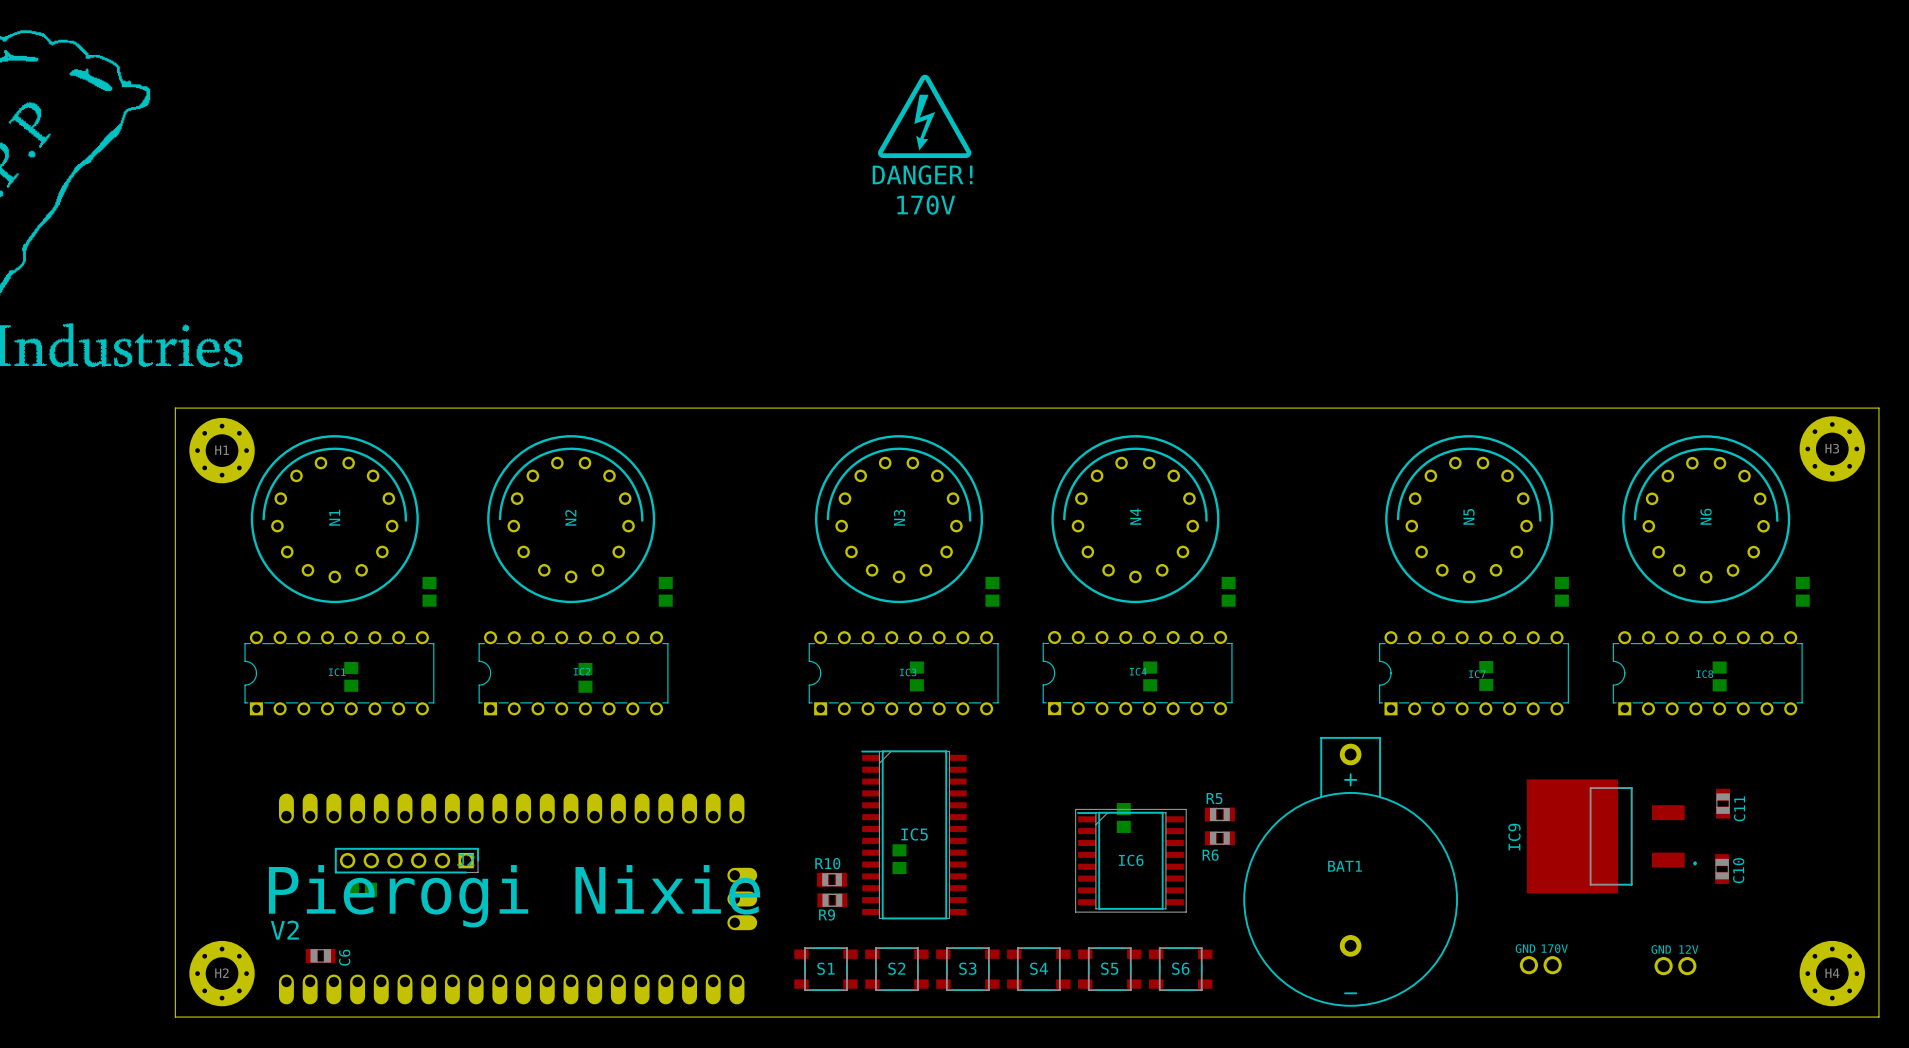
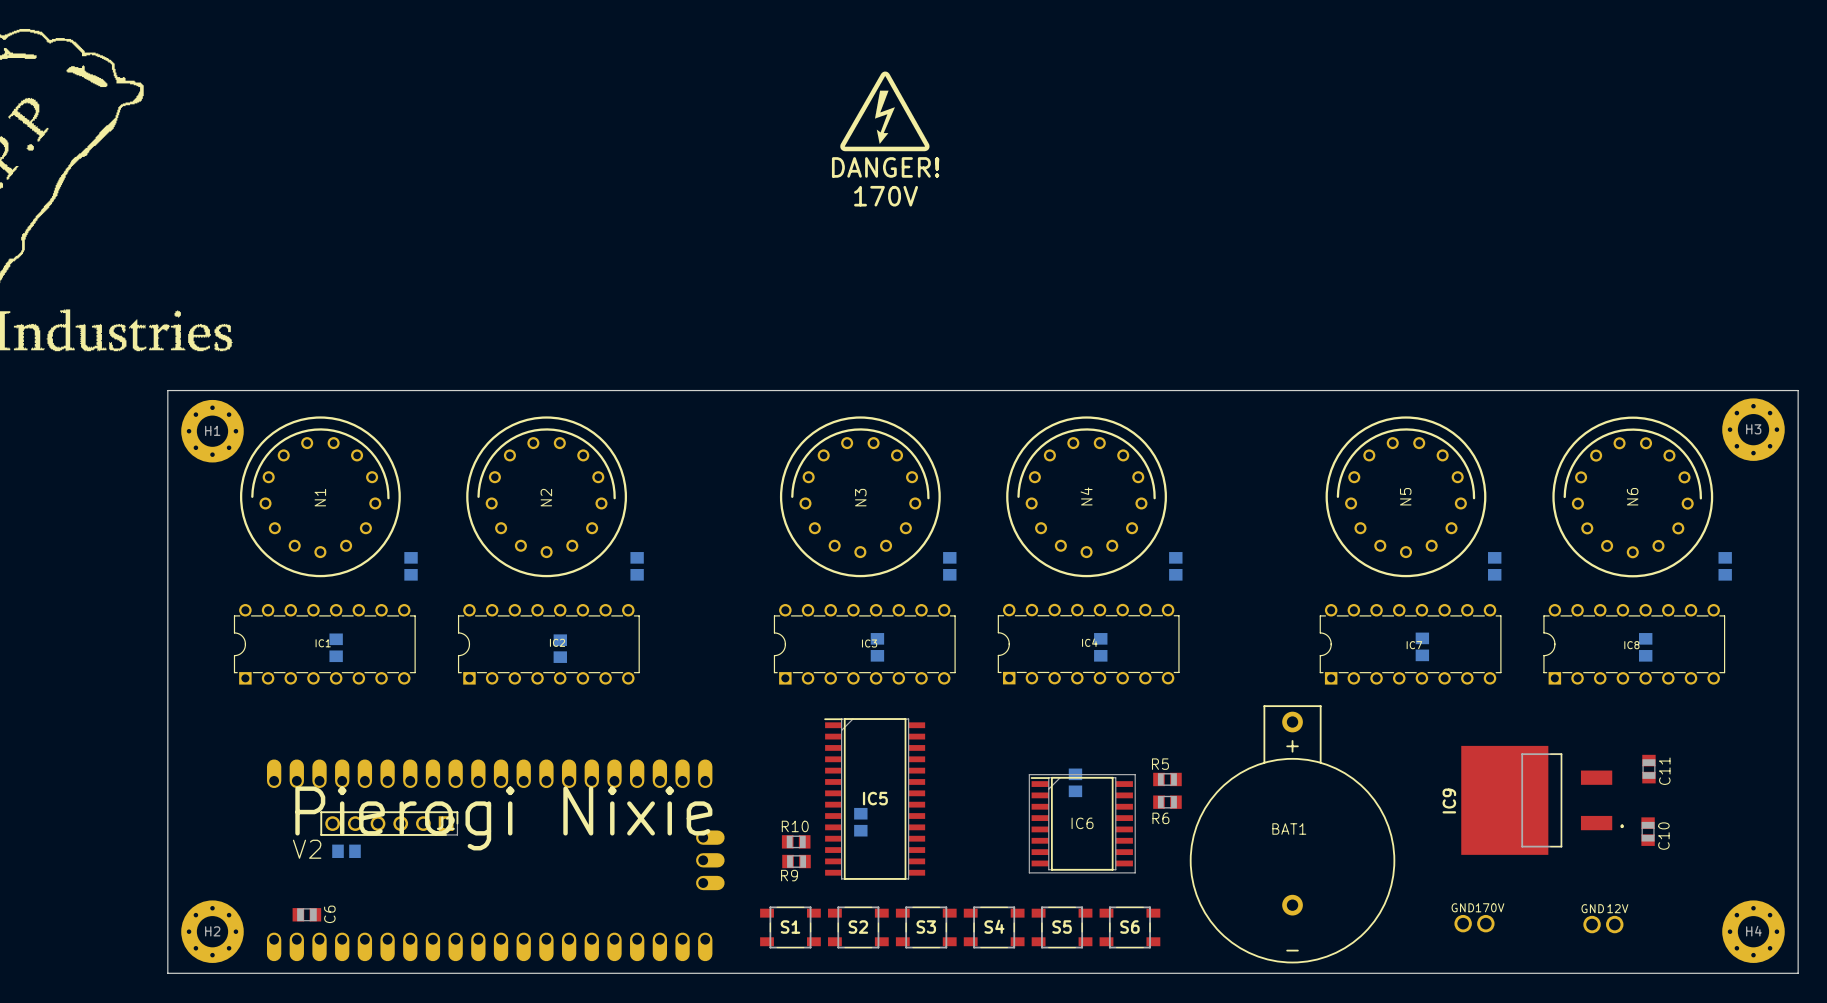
text position: Pierogi Nixie (514, 896) -> Pierogi Nixie (503, 818)
text position: V2 (284, 930) -> V2 (307, 849)

